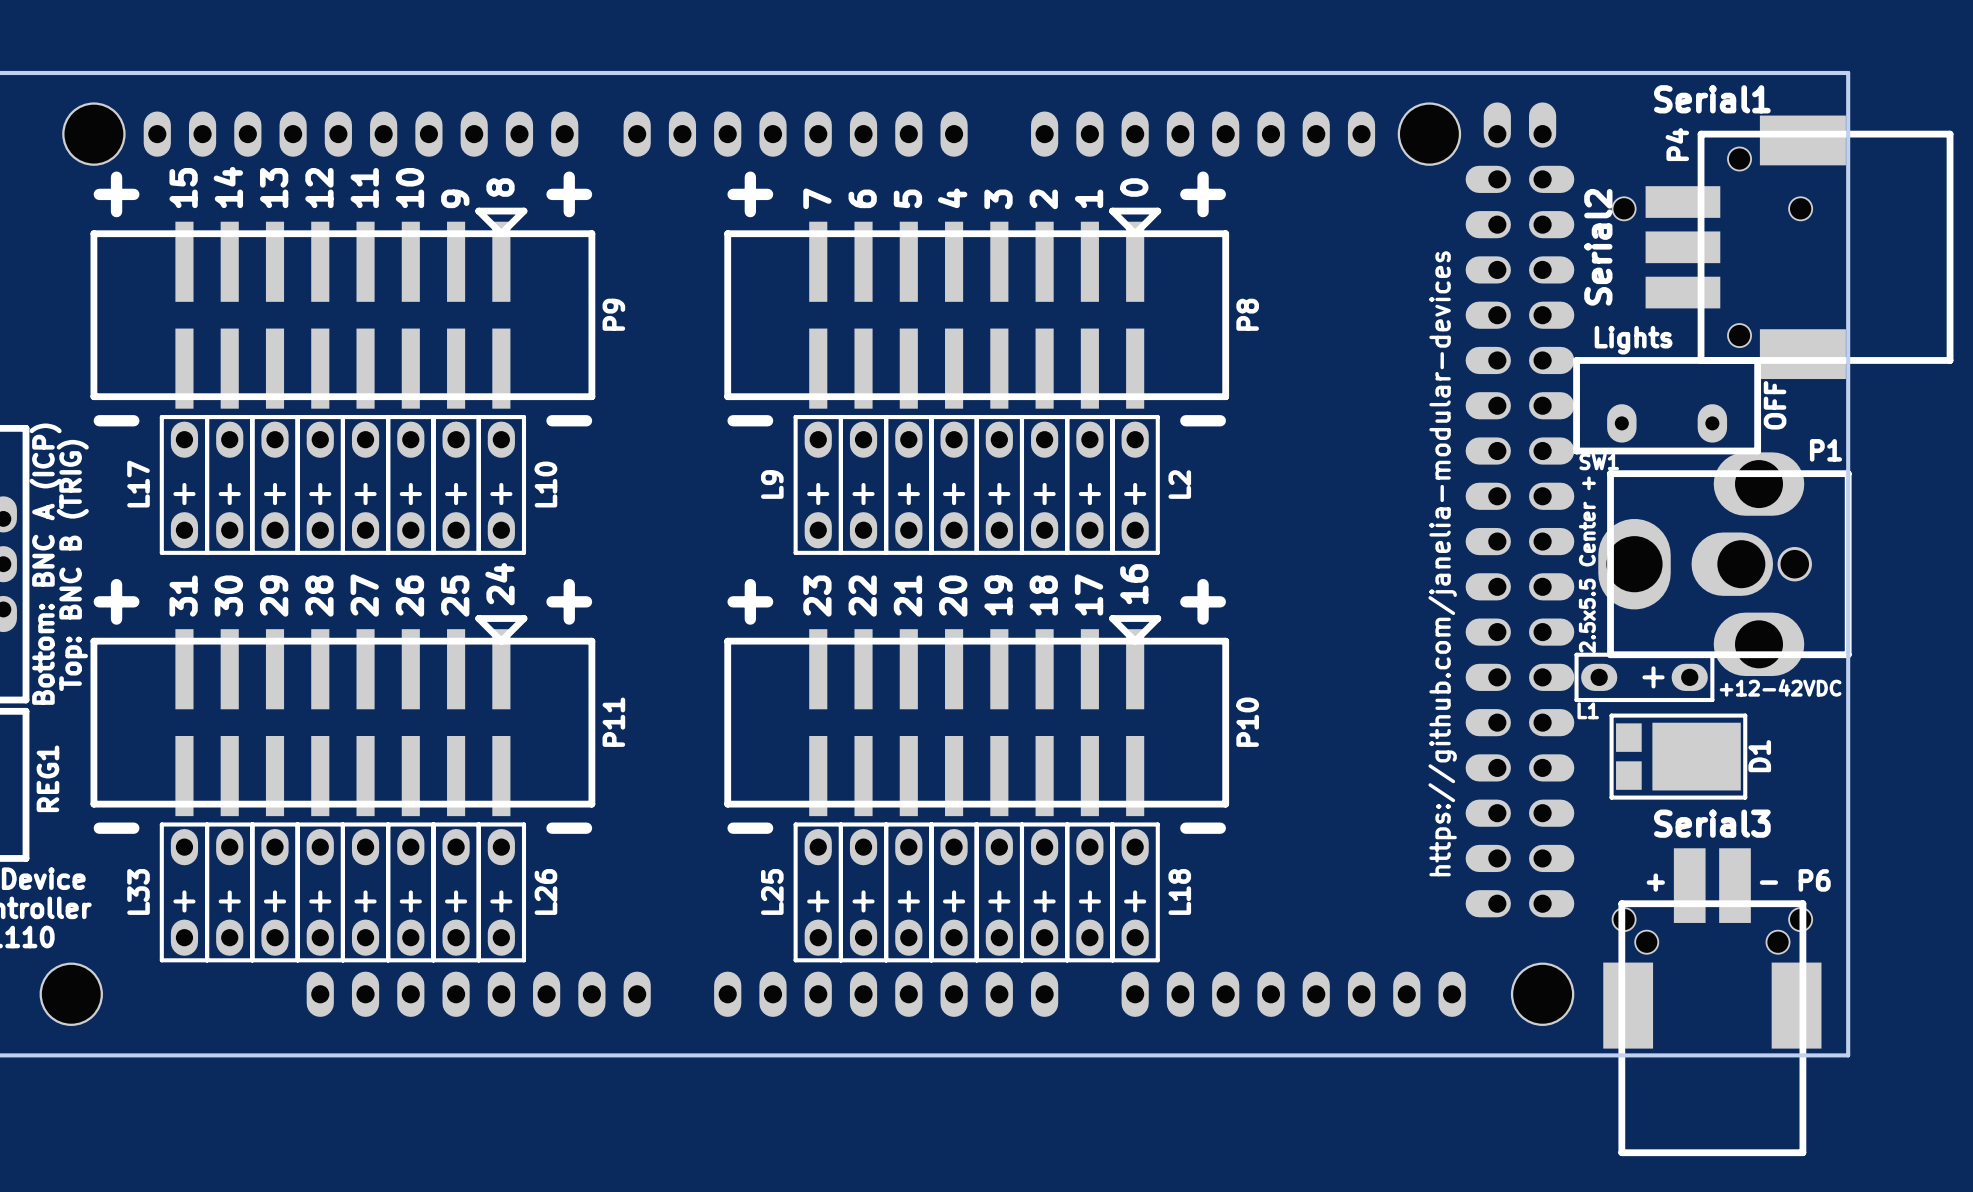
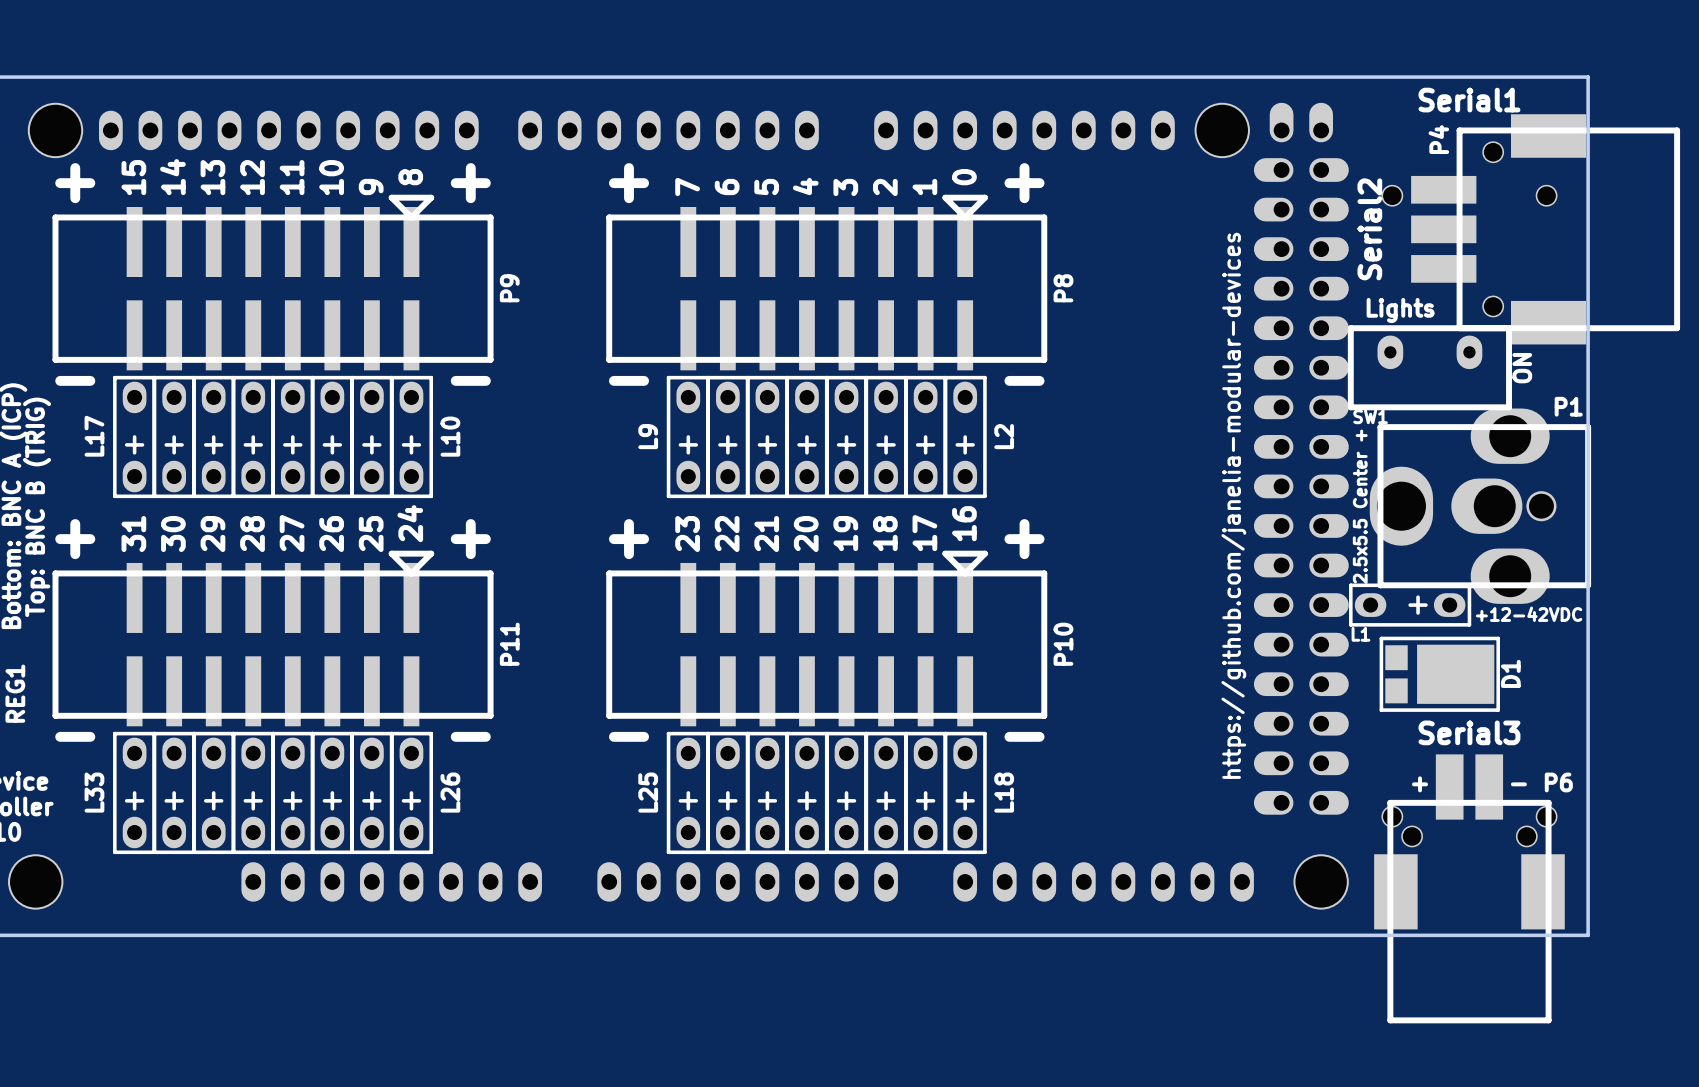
SW1 footprint: [1573, 357, 1762, 455] -> [1347, 325, 1512, 411]

